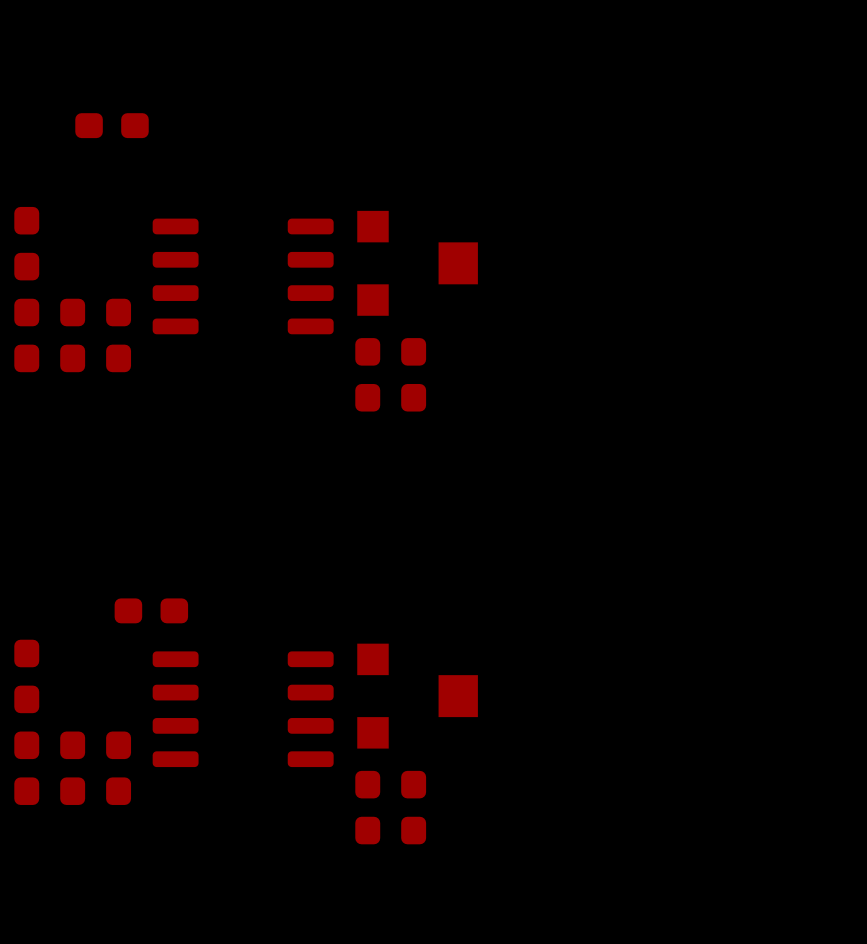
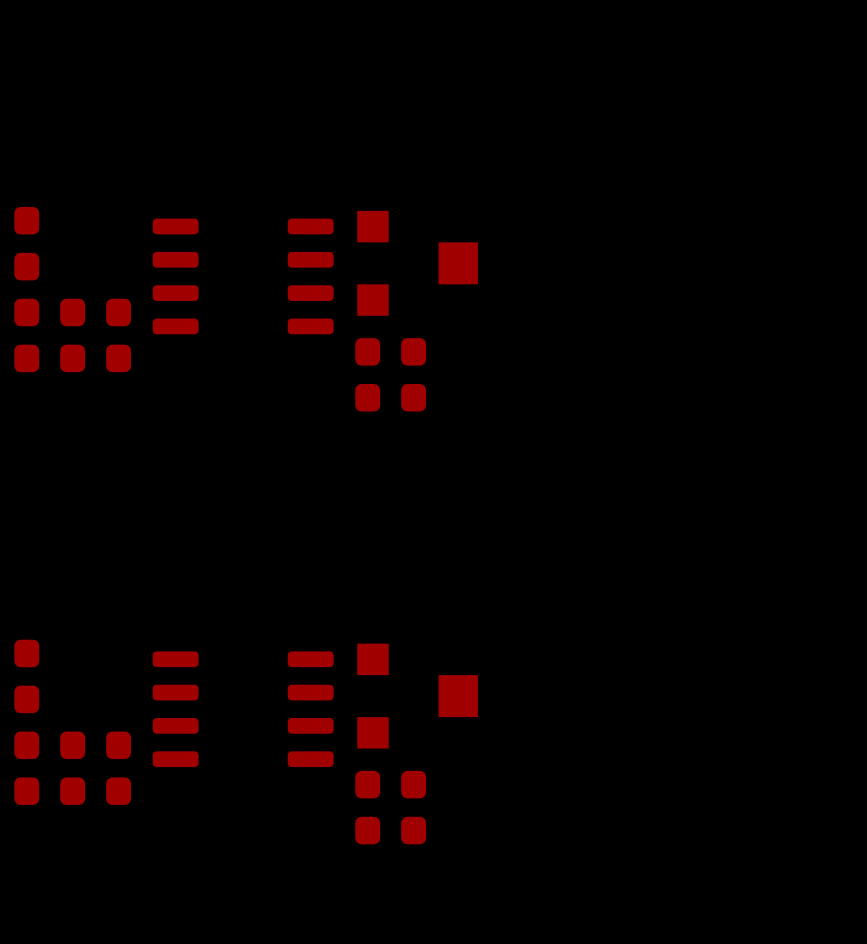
part: (112, 125) -> none
part: (151, 610) -> none

